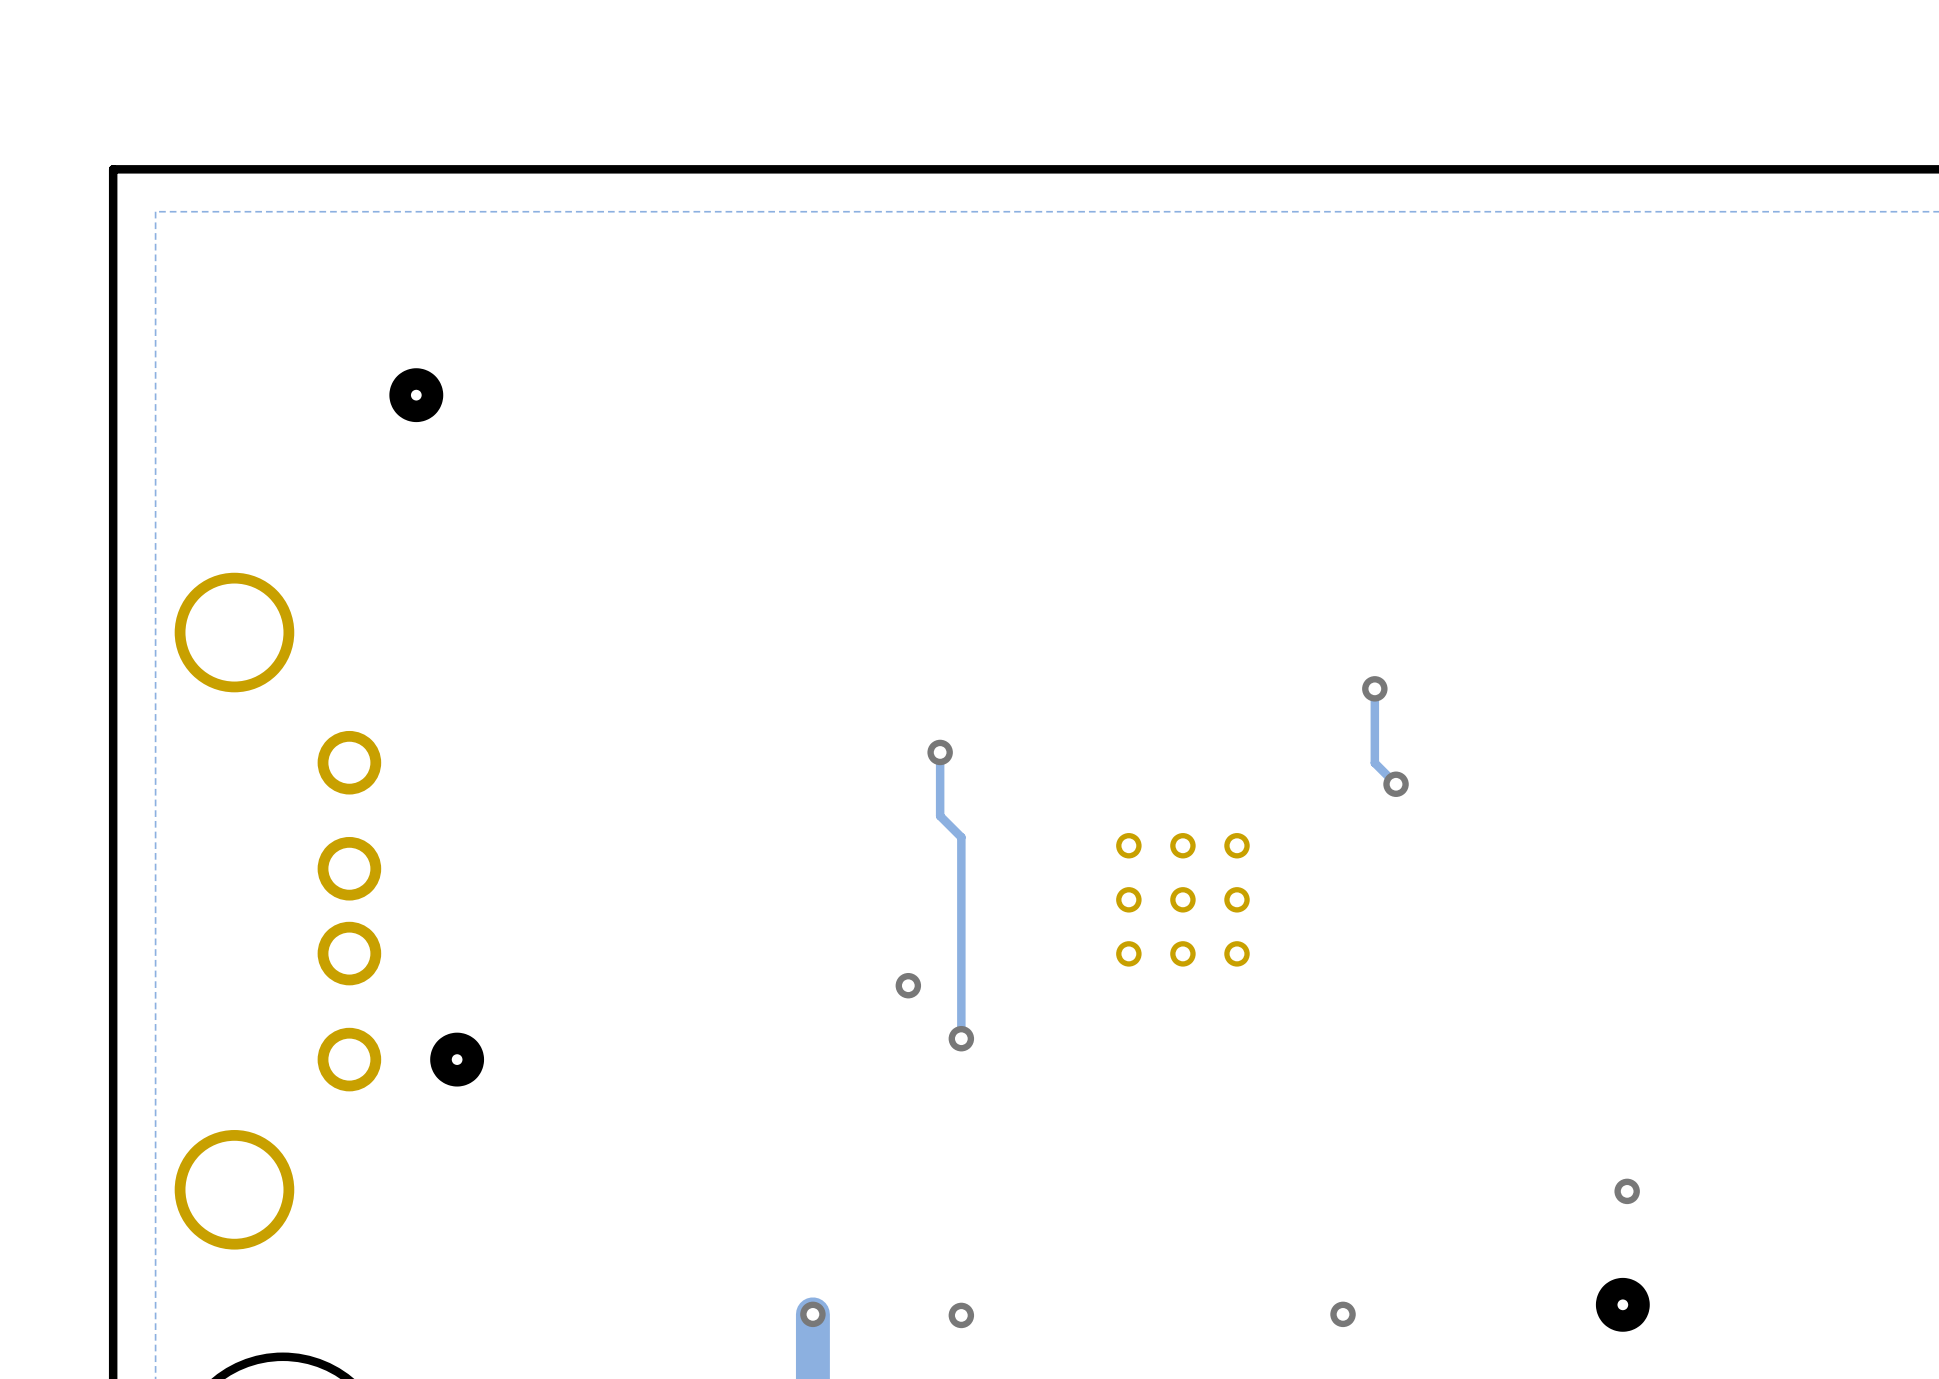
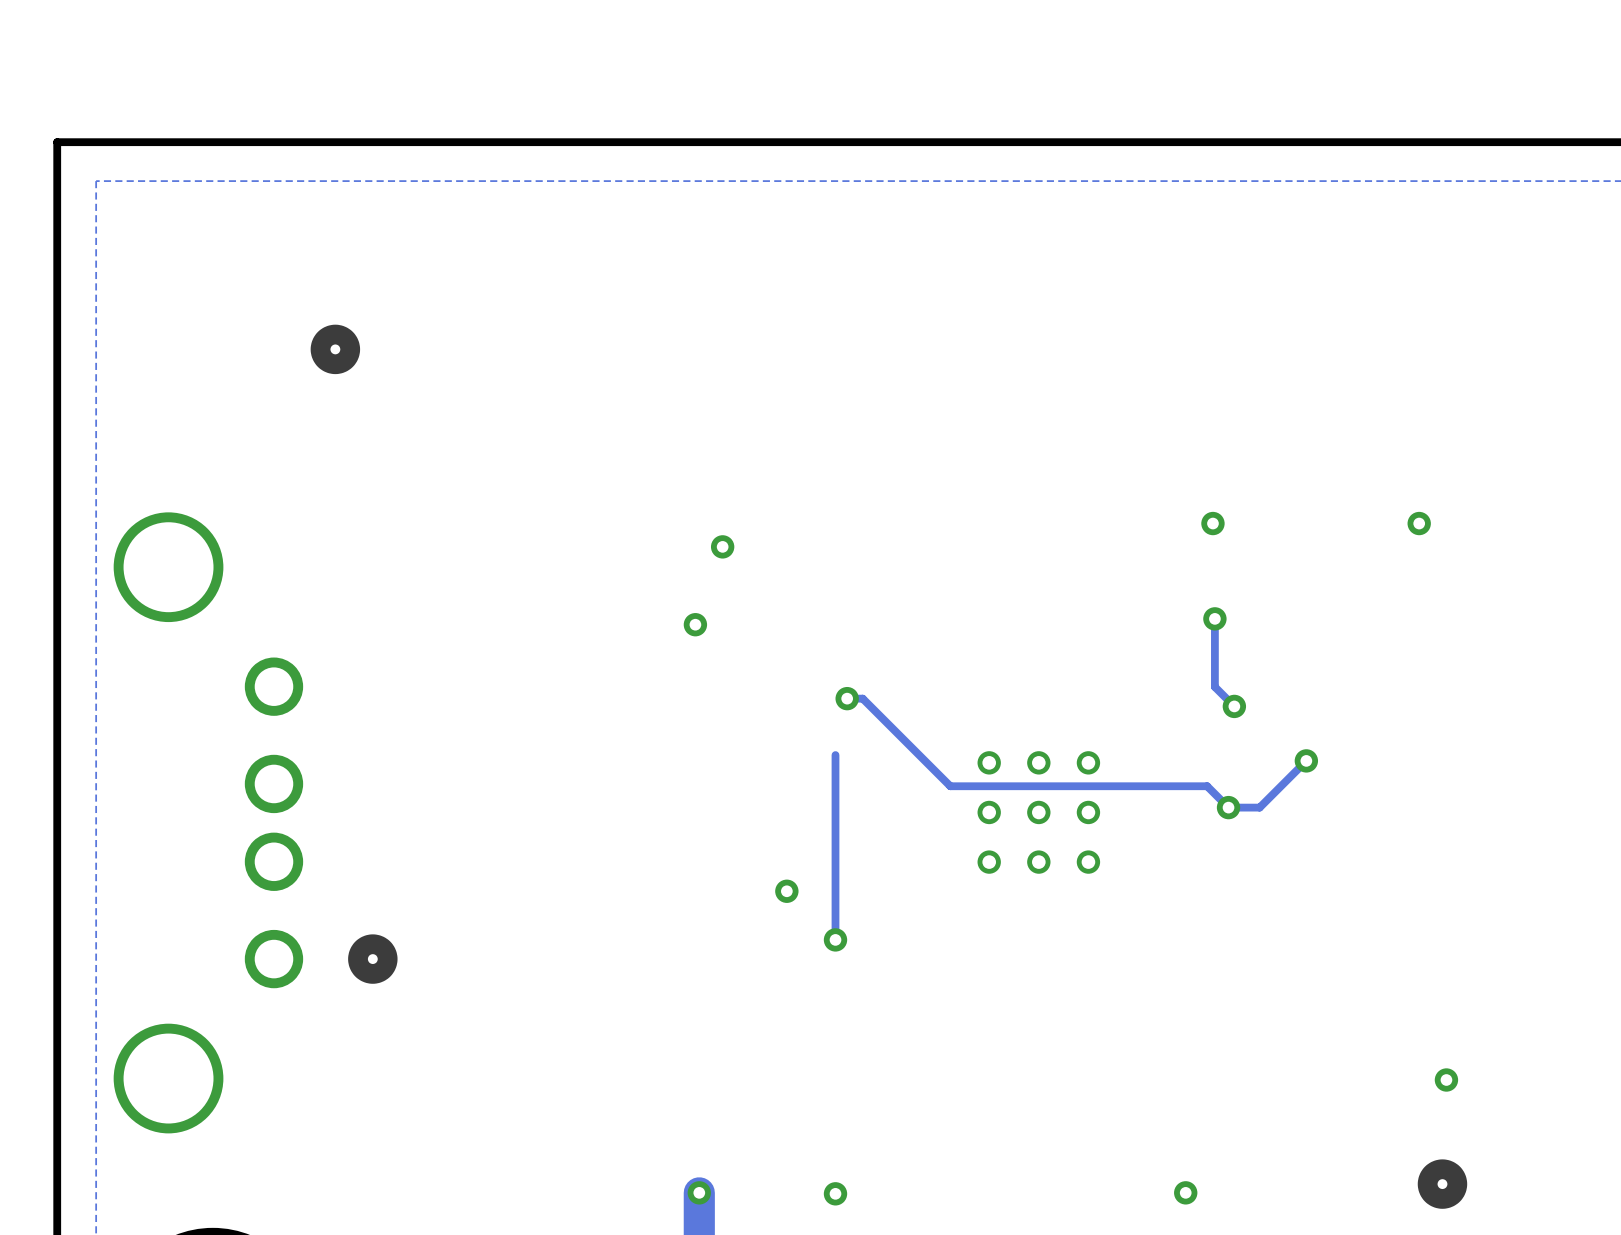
via: none -> (1212, 523)
via: none -> (1419, 523)
via: none -> (722, 546)
via: none -> (695, 624)
track: (940, 752) (940, 816) (961, 837) -> none
via position: (940, 752) -> (847, 698)
track: none -> (847, 698) (862, 698) (950, 786) (1207, 786) (1228, 807) (1259, 807) (1306, 760)
via: none -> (1306, 760)
via: none -> (1228, 807)

